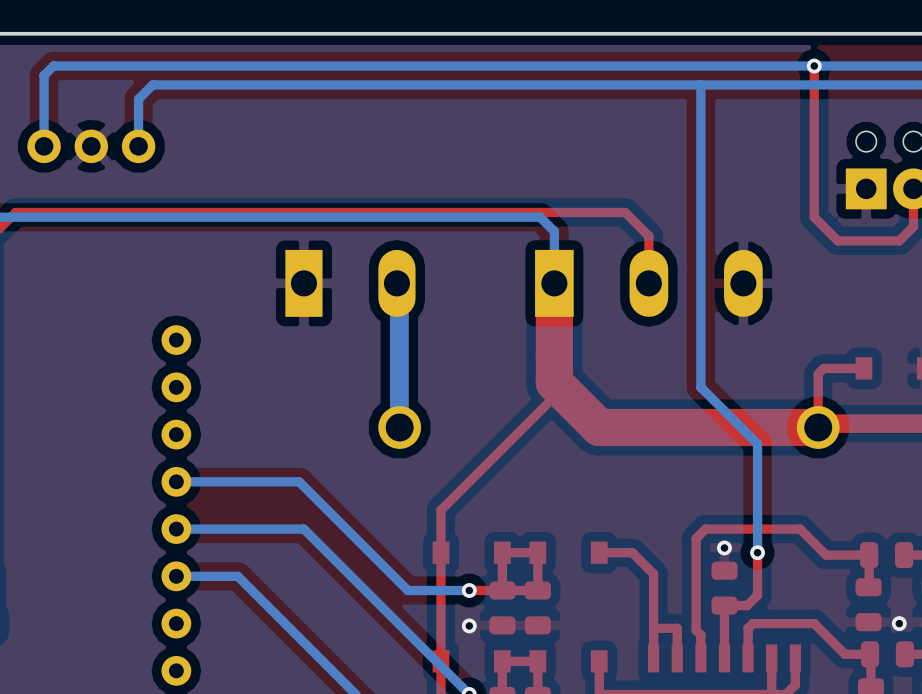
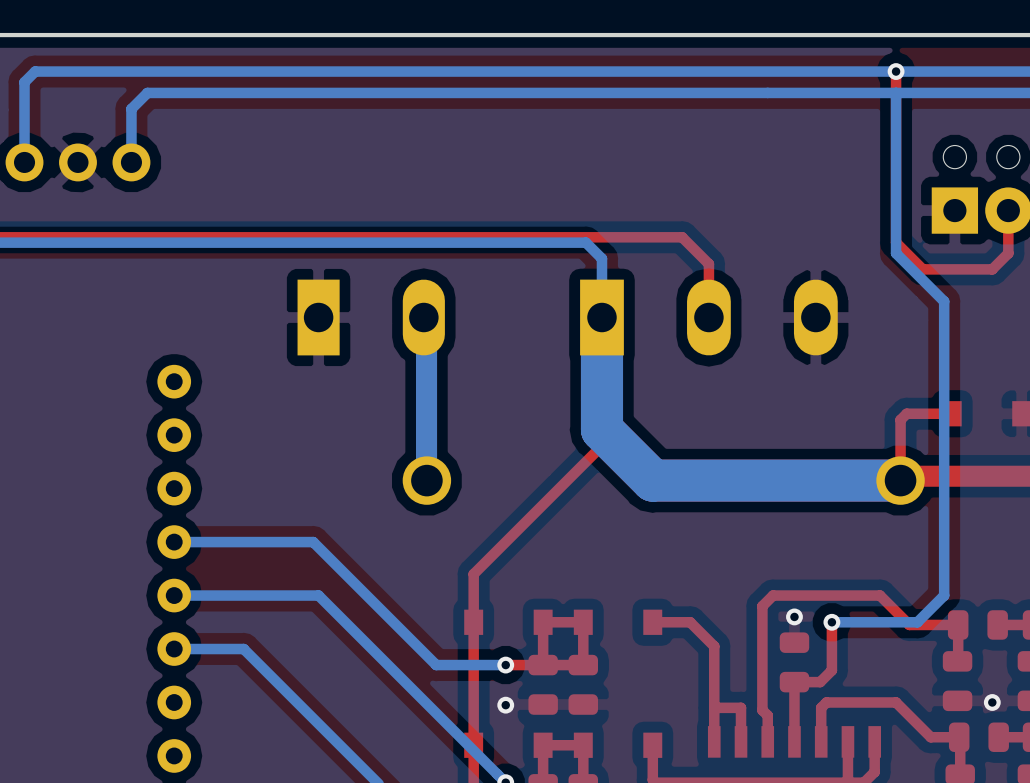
bottom track: (700, 84) (700, 387) (757, 444) (757, 552) -> (896, 92) (896, 253) (944, 301) (944, 595) (917, 622) (831, 622)
bottom track: none -> (601, 317) (601, 429) (652, 480) (900, 480)

